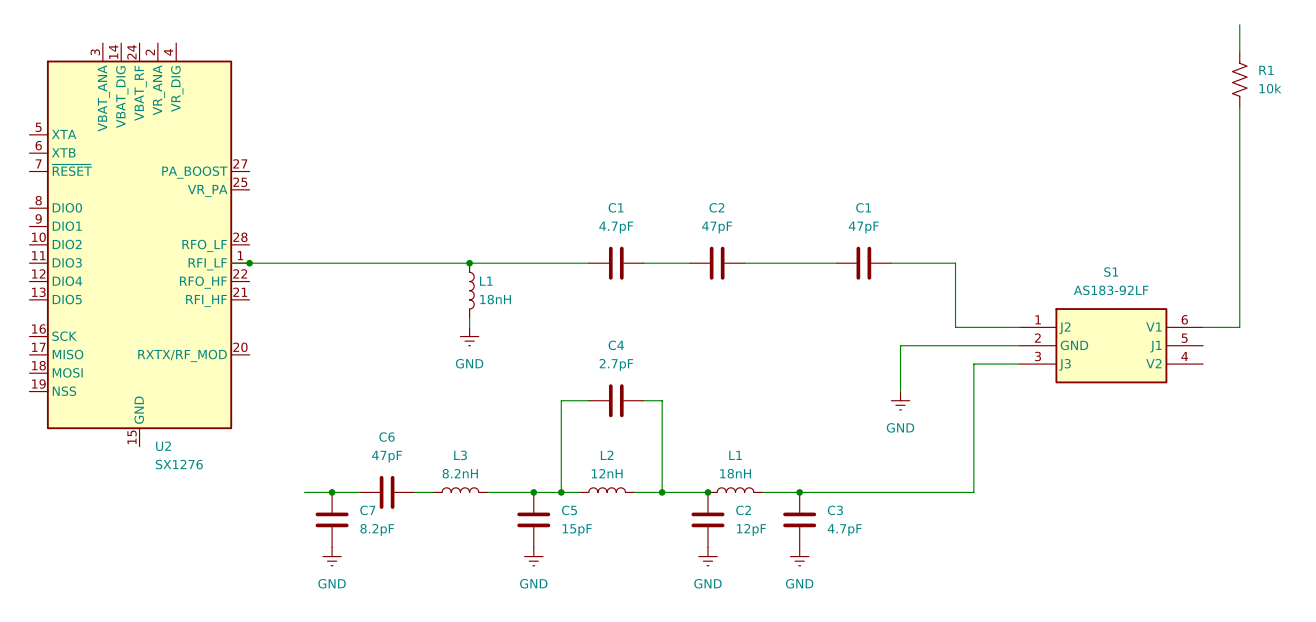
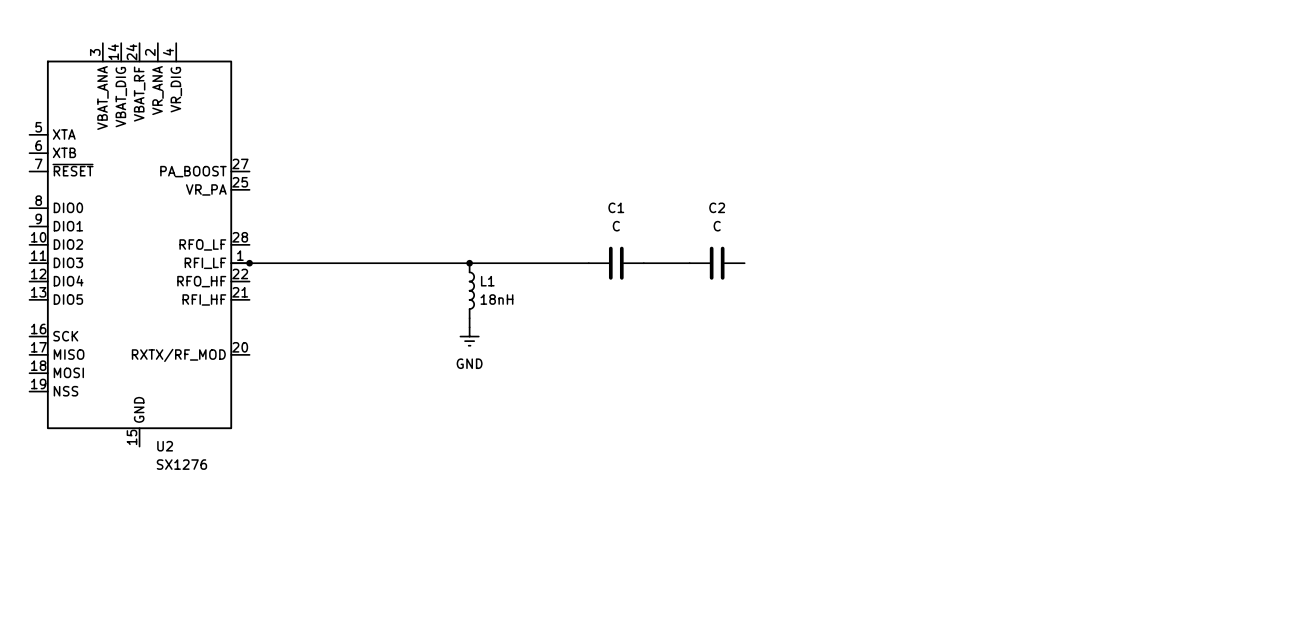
wire: (1239, 24) (1239, 52) -> none
R1: 10k (1239, 79) -> none
wire: (1239, 107) (1239, 327) (1203, 327) -> none
C1 value: 4.7pF (616, 227) -> C (616, 226)
C2 value: 47pF (717, 227) -> C (717, 226)
wire: (744, 263) (836, 263) -> none
C1: 47pF (863, 263) -> none
wire: (891, 263) (955, 263) (955, 327) (1019, 327) -> none
wire: (1019, 345) (900, 345) (900, 391) -> none
S1: AS183-92LF (1111, 345) -> none
wire: (1019, 364) (973, 364) (973, 492) (763, 492) -> none
wire: (588, 400) (561, 400) (561, 492) -> none
C4: 2.7pF (616, 400) -> none
wire: (643, 400) (662, 400) (662, 492) -> none
power symbol: GND (900, 400) -> none
L3: 8.2nH (460, 490) -> none
L2: 12nH (607, 490) -> none
L1: 18nH (735, 490) -> none
wire: (304, 492) (359, 492) -> none
junction: (332, 492) -> none
C6: 47pF (387, 492) -> none
wire: (414, 492) (432, 492) -> none
wire: (487, 492) (579, 492) -> none
junction: (533, 492) -> none
junction: (561, 492) -> none
wire: (634, 492) (707, 492) -> none
junction: (662, 492) -> none
junction: (707, 492) -> none
junction: (799, 492) -> none
C7: 8.2pF (332, 519) -> none
C5: 15pF (533, 519) -> none
C2: 12pF (707, 519) -> none
C3: 4.7pF (799, 519) -> none
power symbol: GND (332, 556) -> none
power symbol: GND (533, 556) -> none
power symbol: GND (707, 556) -> none
power symbol: GND (799, 556) -> none

